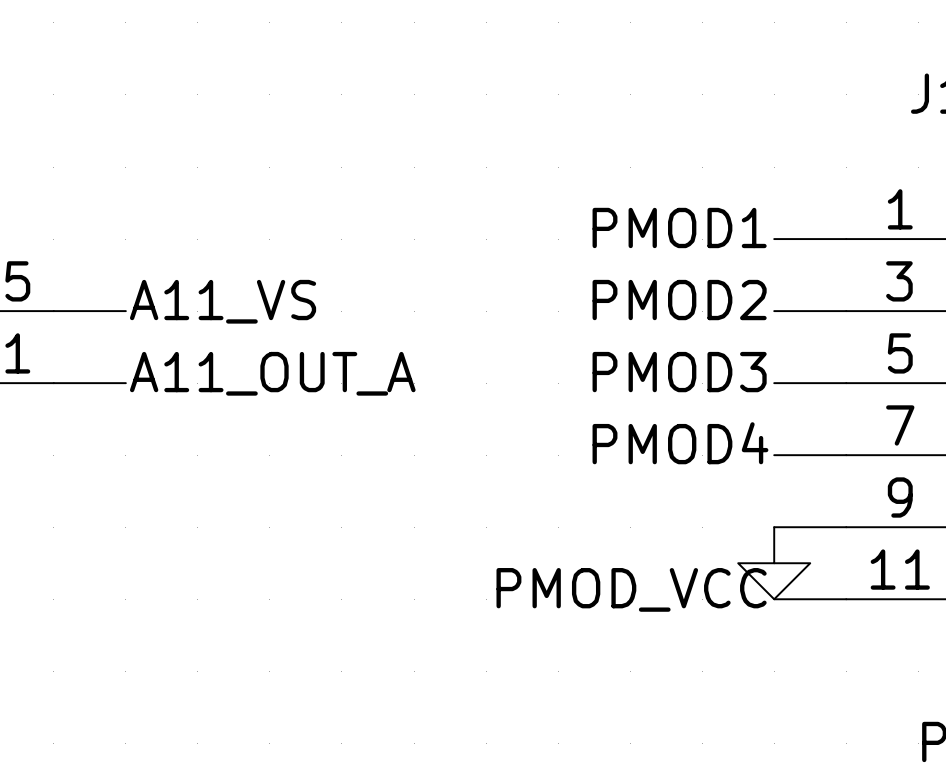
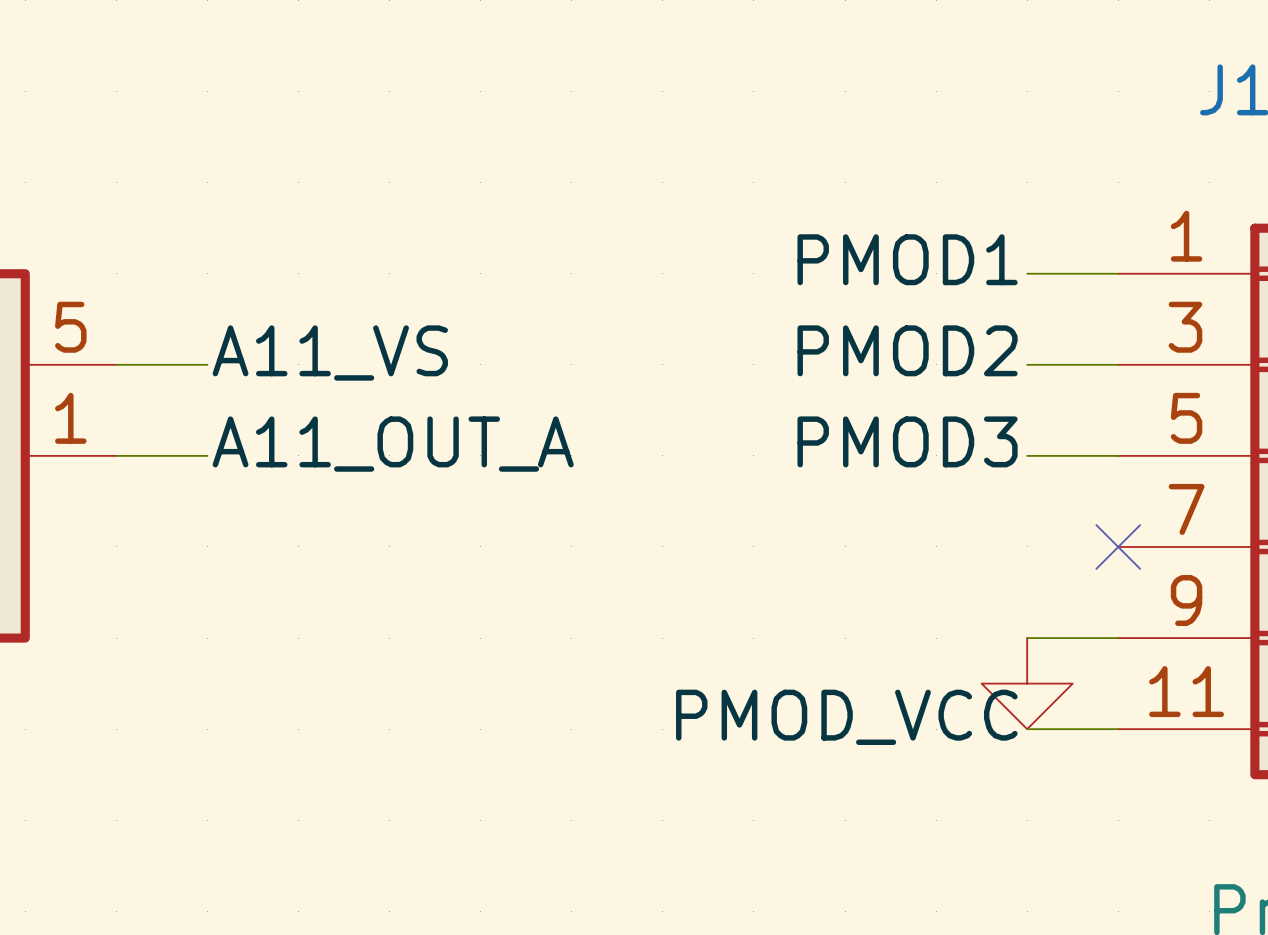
label: PMOD4 (680, 443) -> none
wire: (774, 455) (846, 455) -> none
no-connect mark: none -> (1118, 546)

